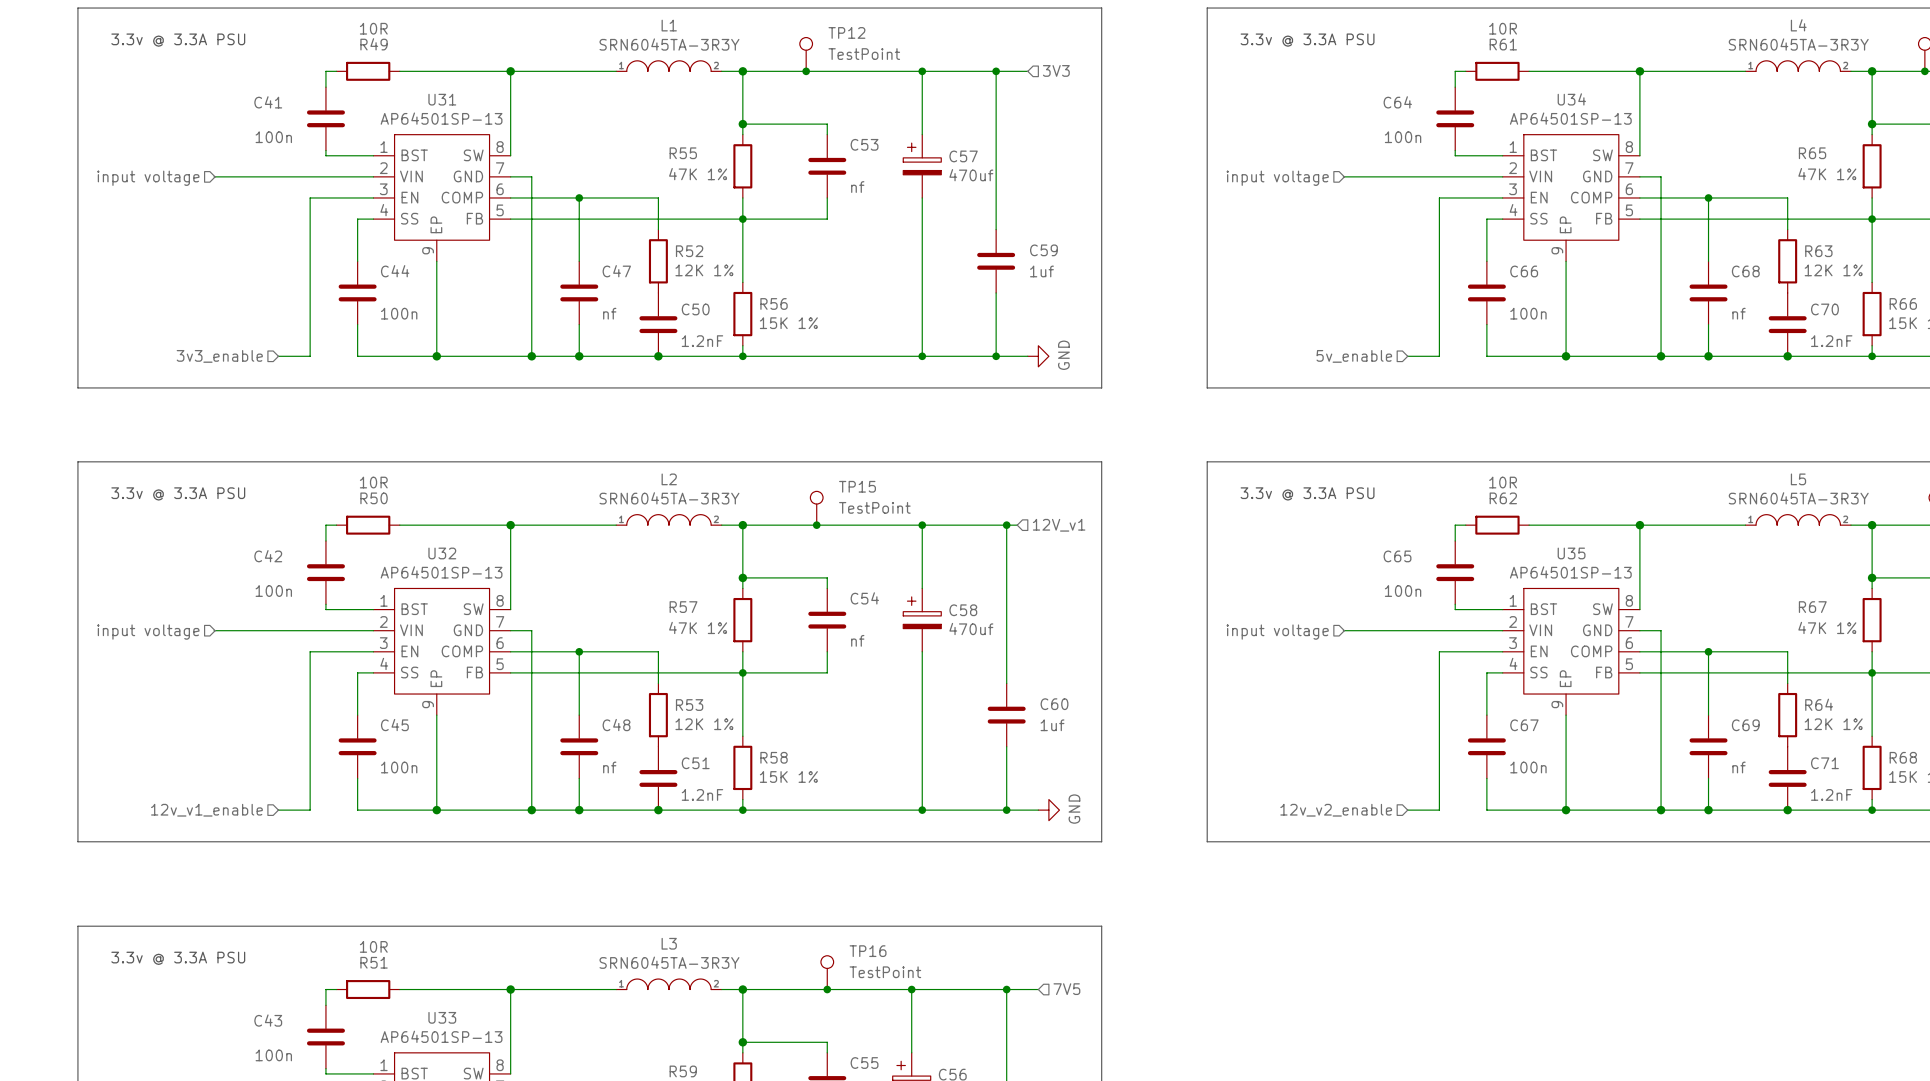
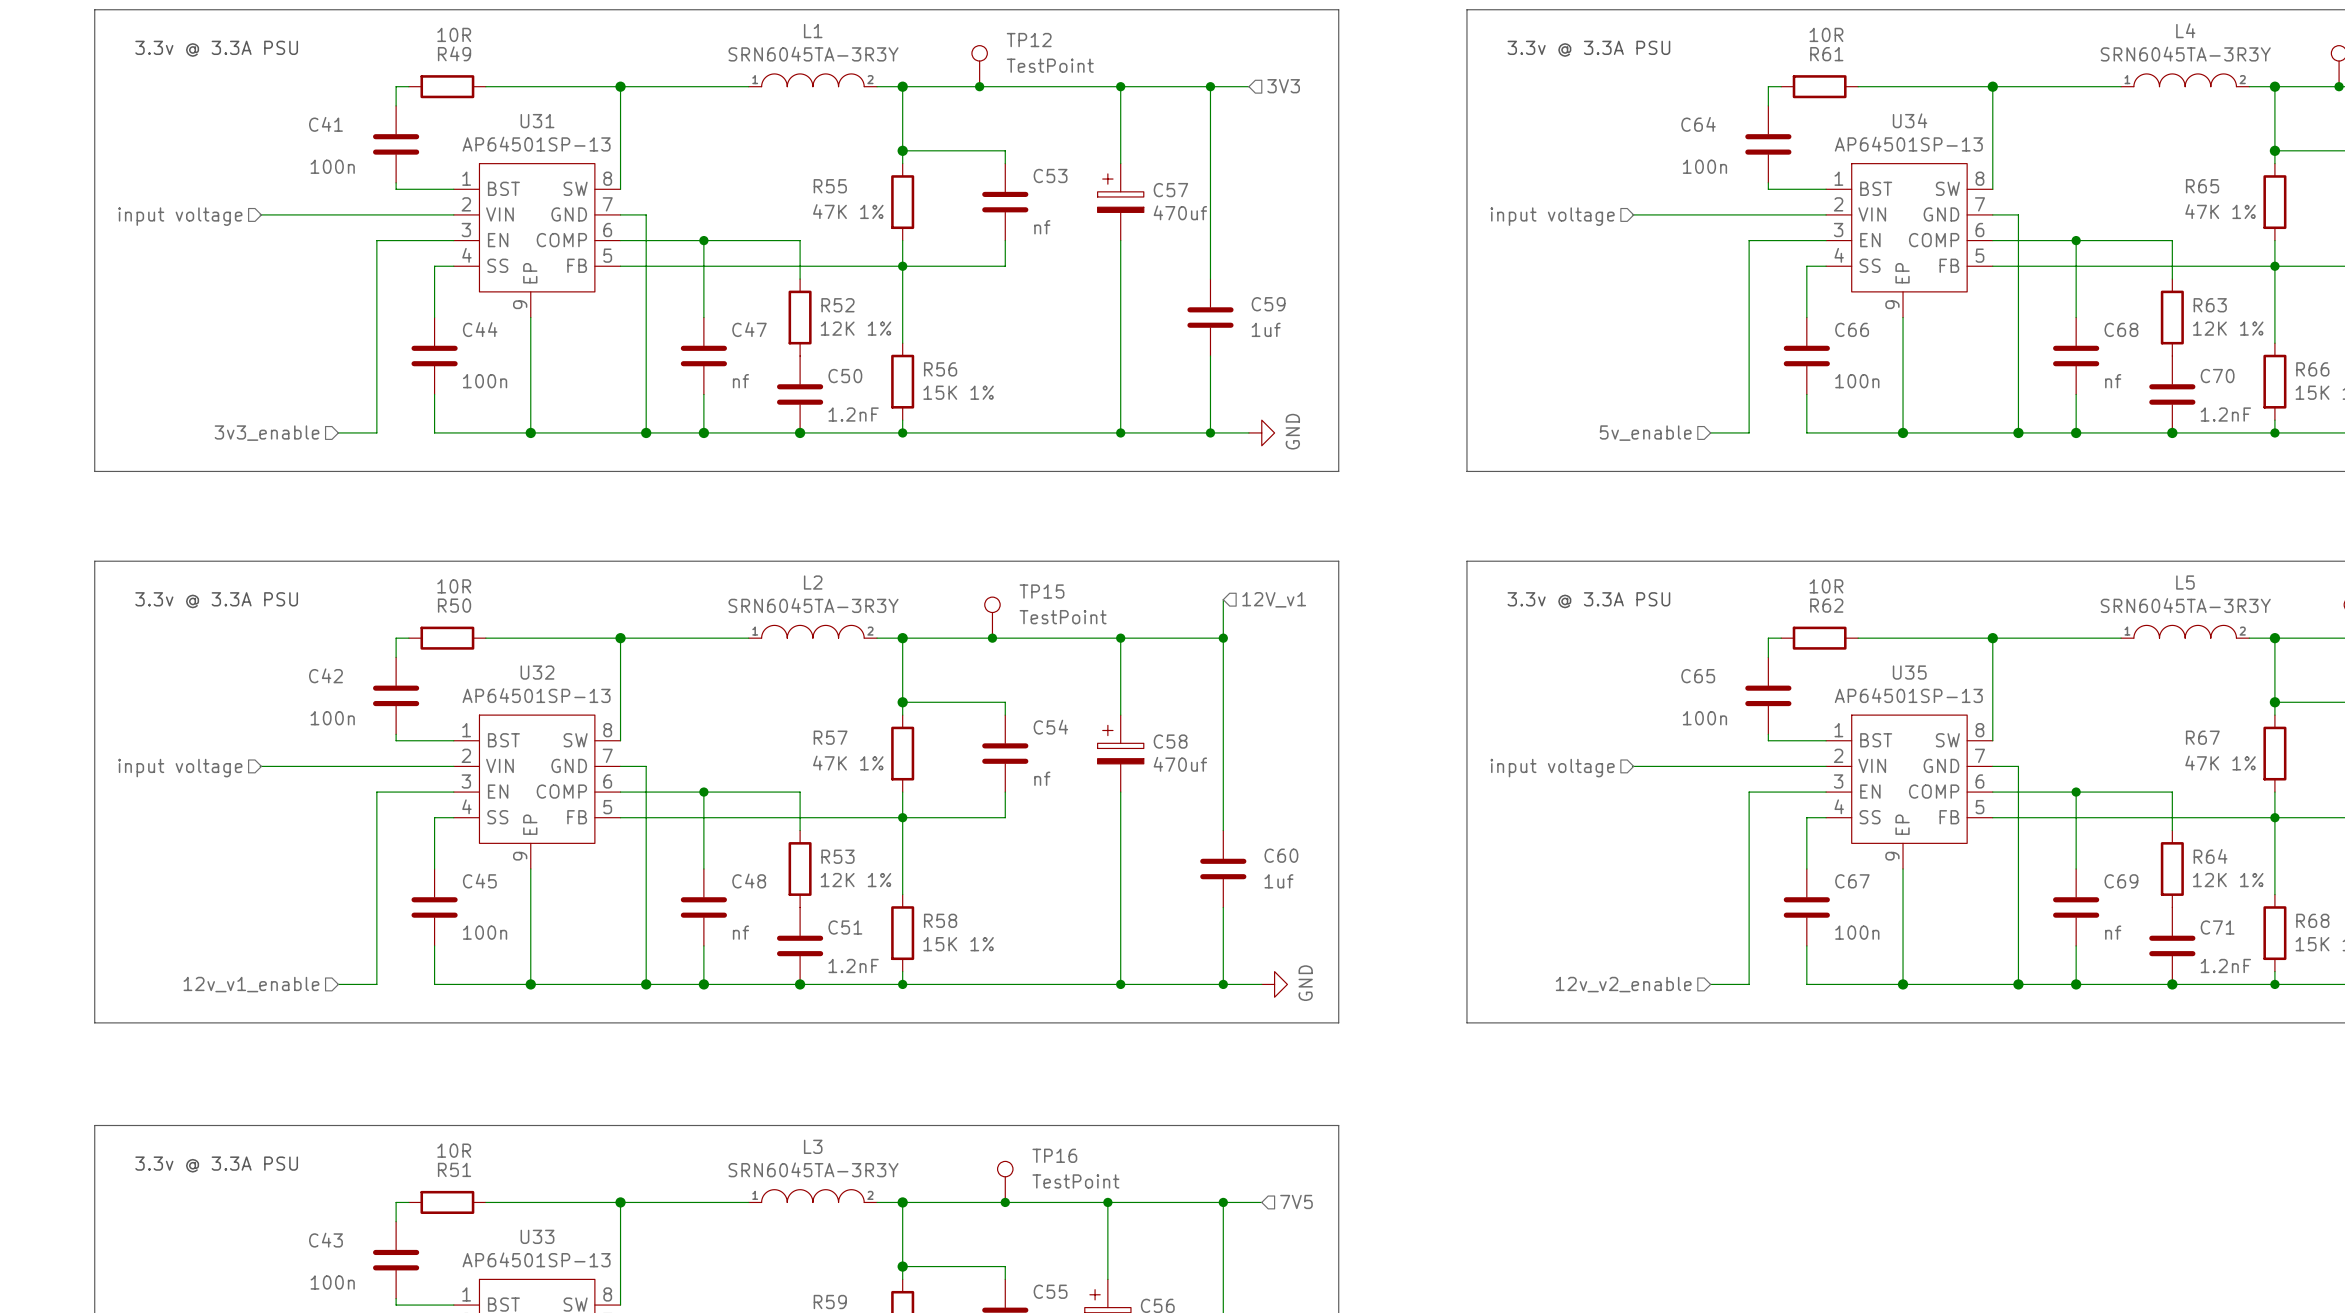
wire: (1006, 525) (1017, 525) -> (1223, 638) (1223, 599)
hierarchical label position: 12V_v1 (1059, 525) -> 12V_v1 (1274, 599)

